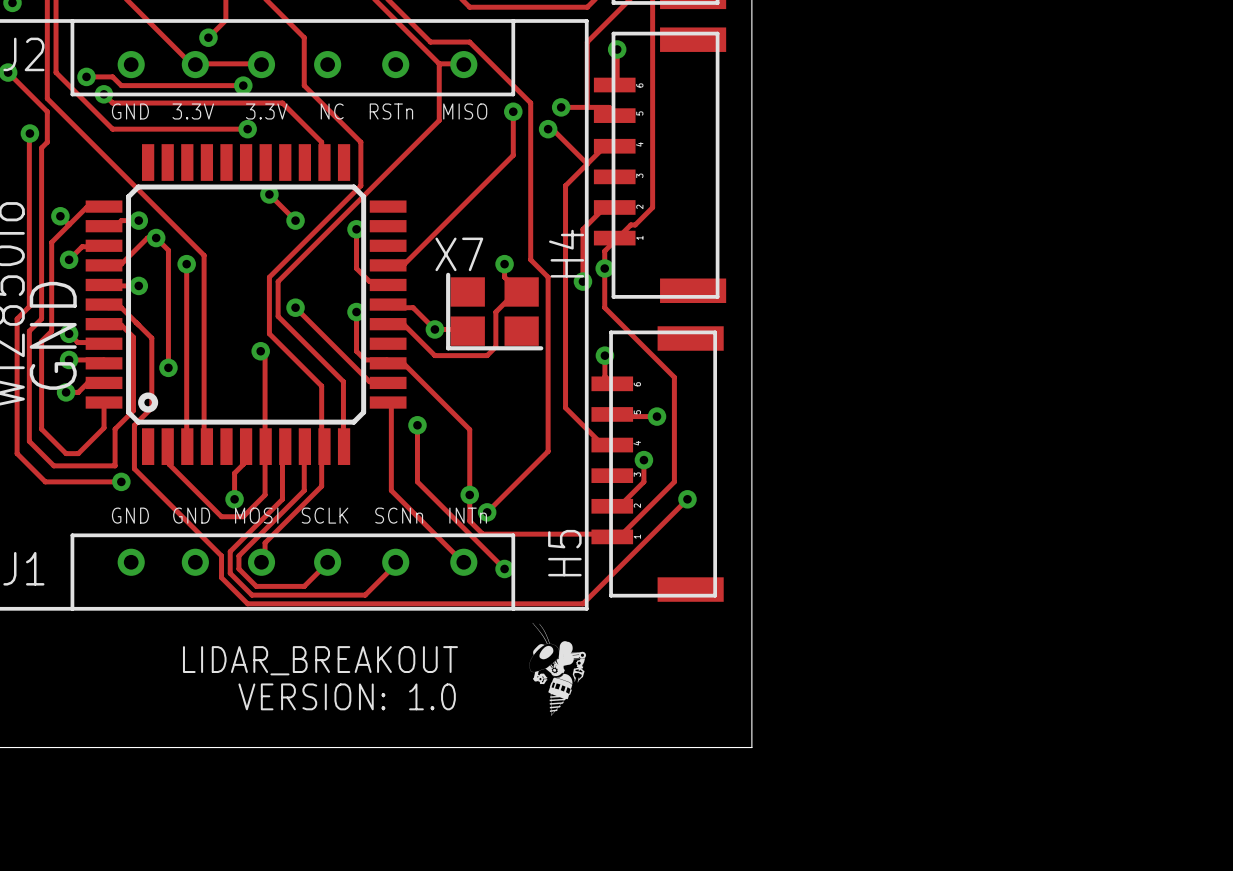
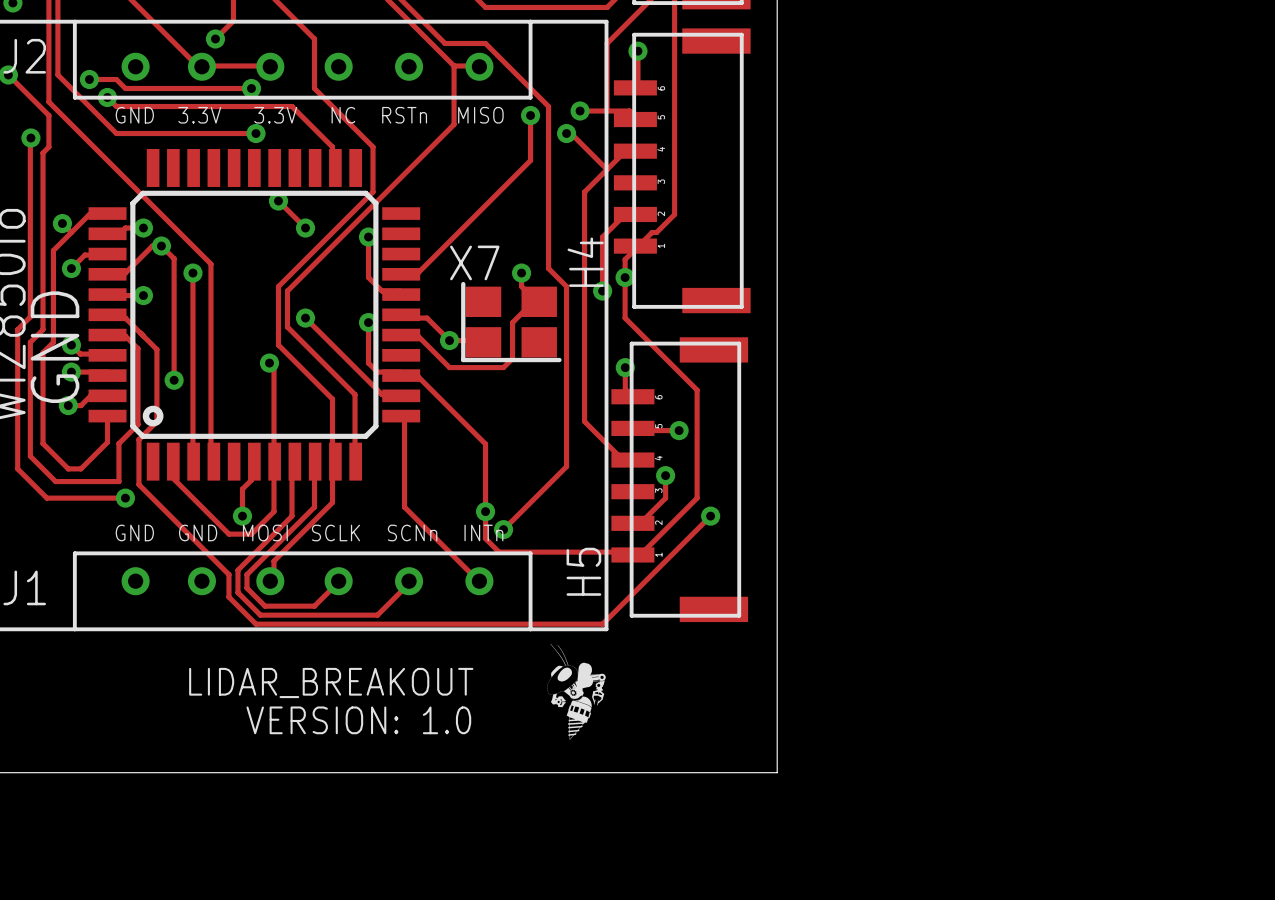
track: (417, 425) (417, 481) (504, 568) -> none
via: (417, 425) -> none
via: (504, 568) -> none

